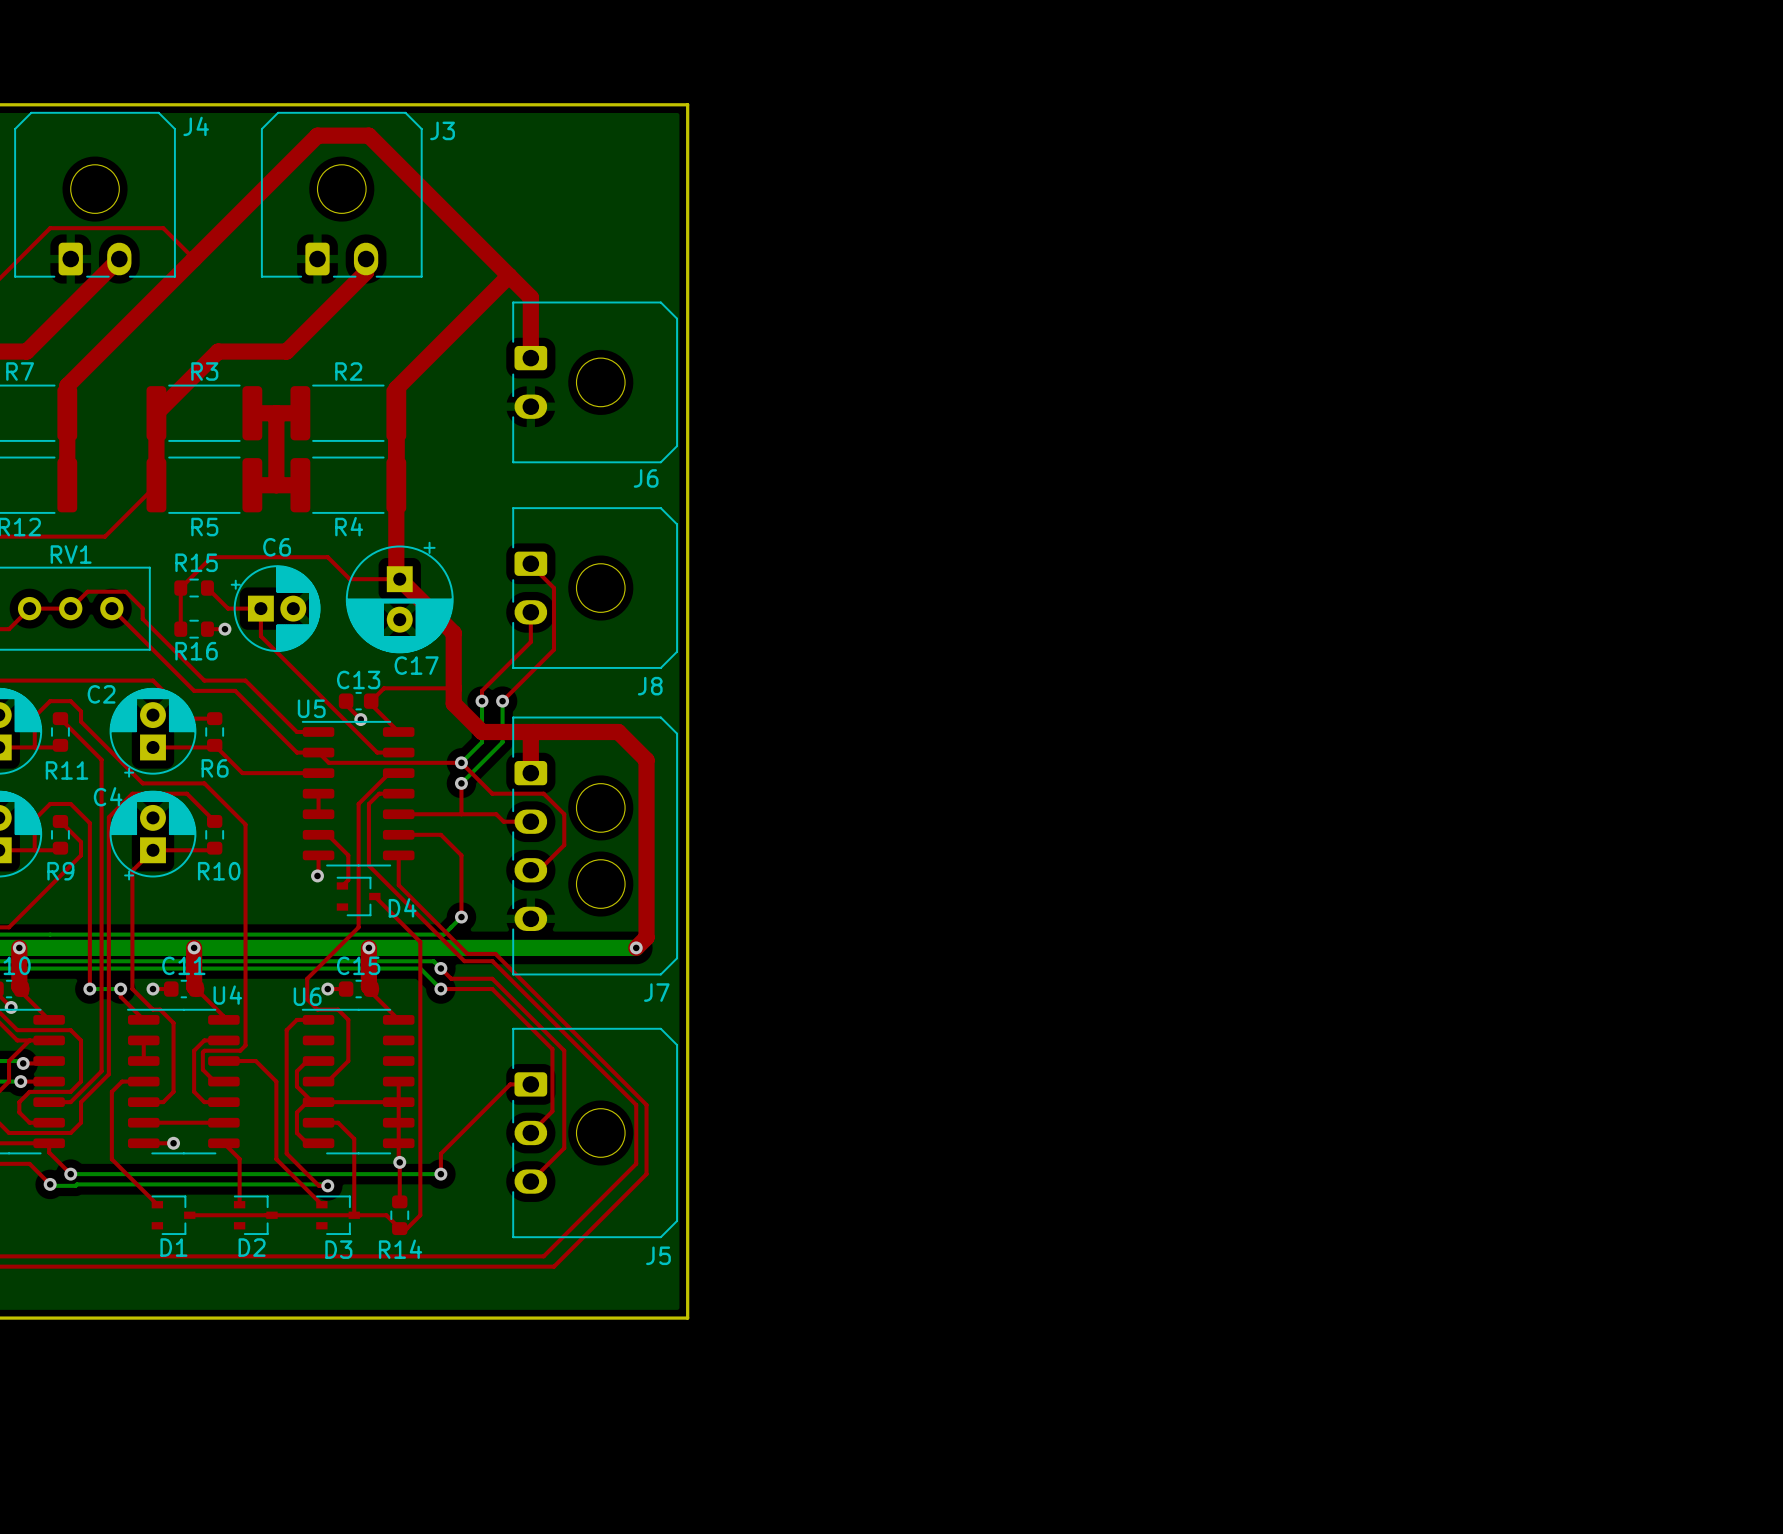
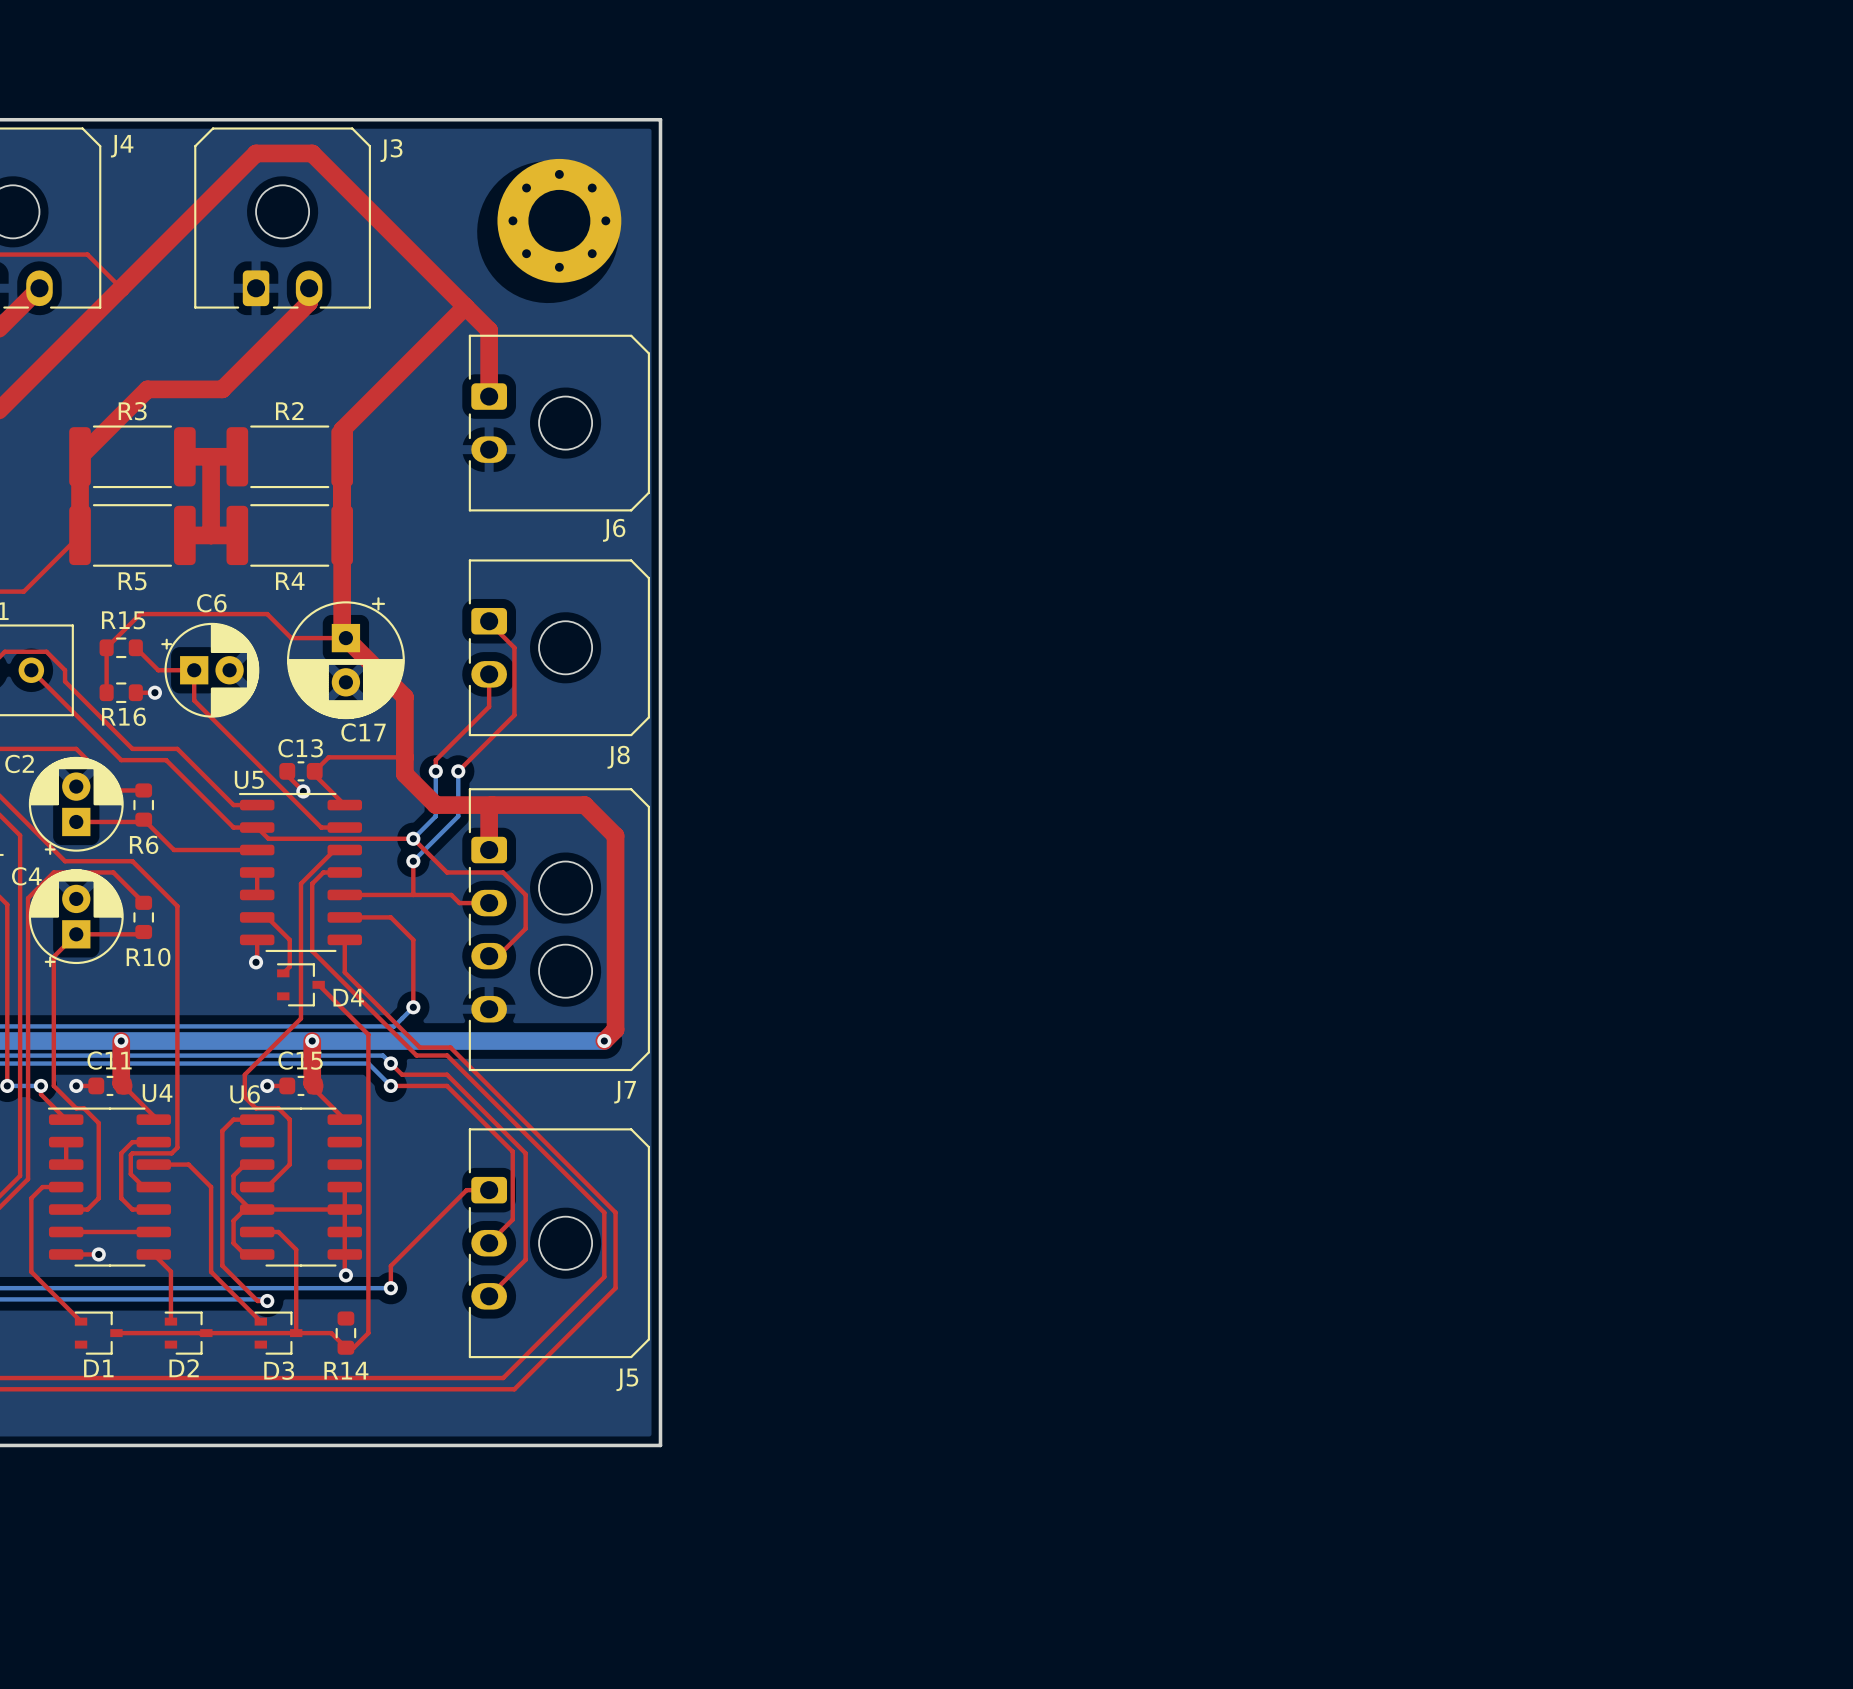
part: none -> (559, 220)
top track: (399, 1162) (399, 1201) -> none

